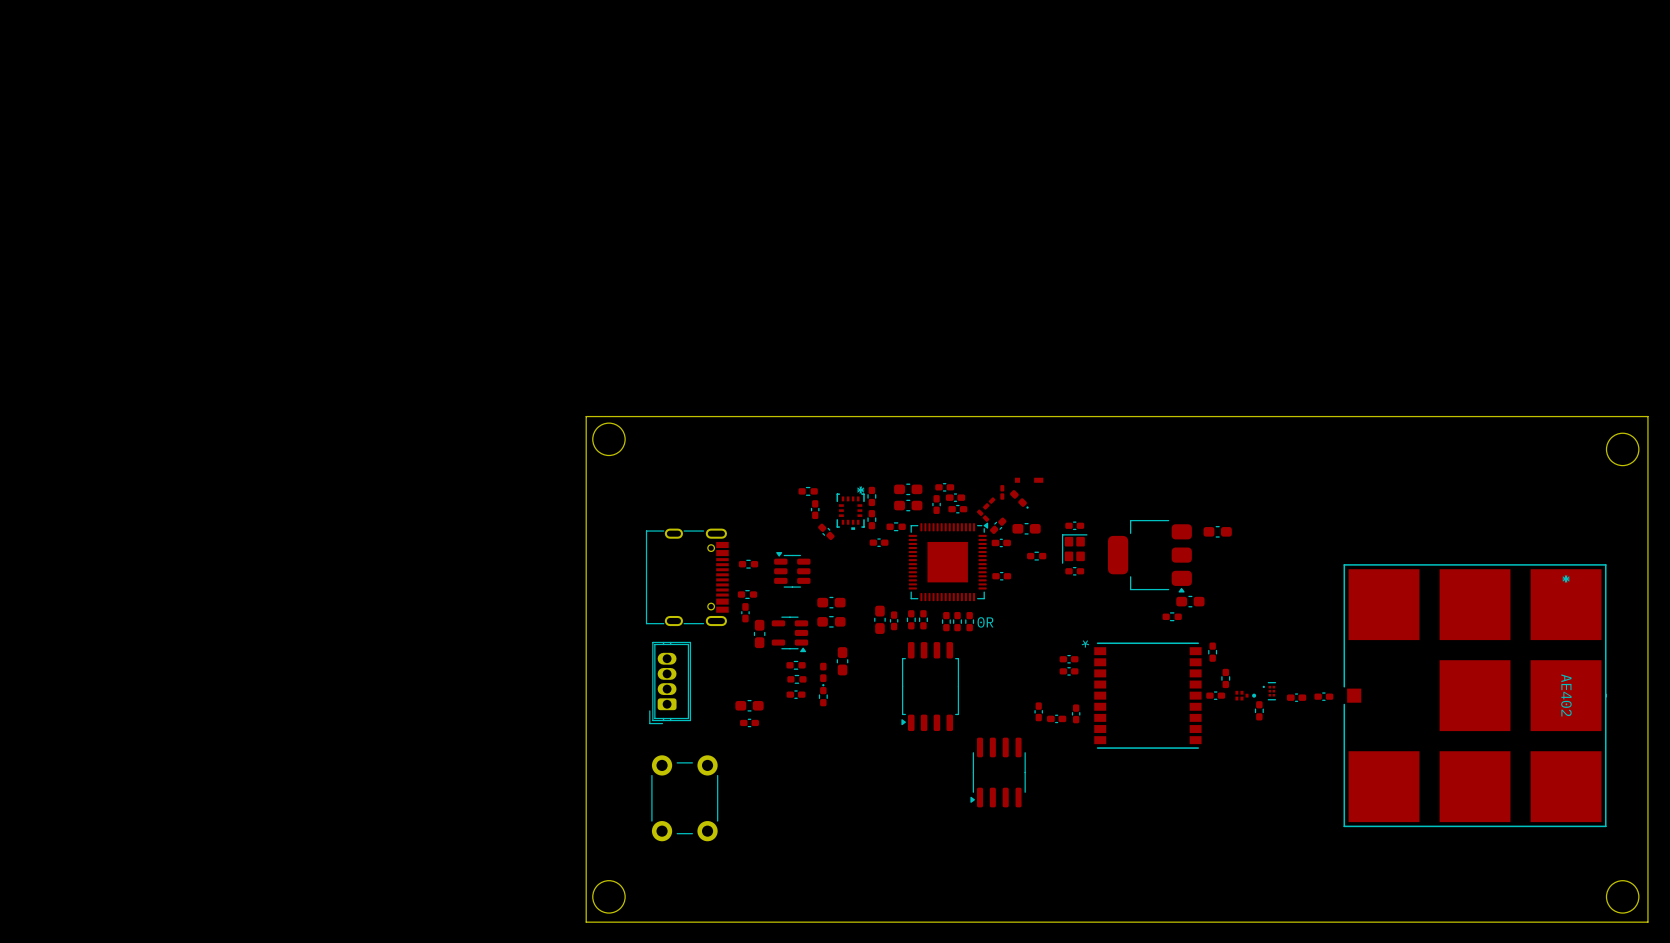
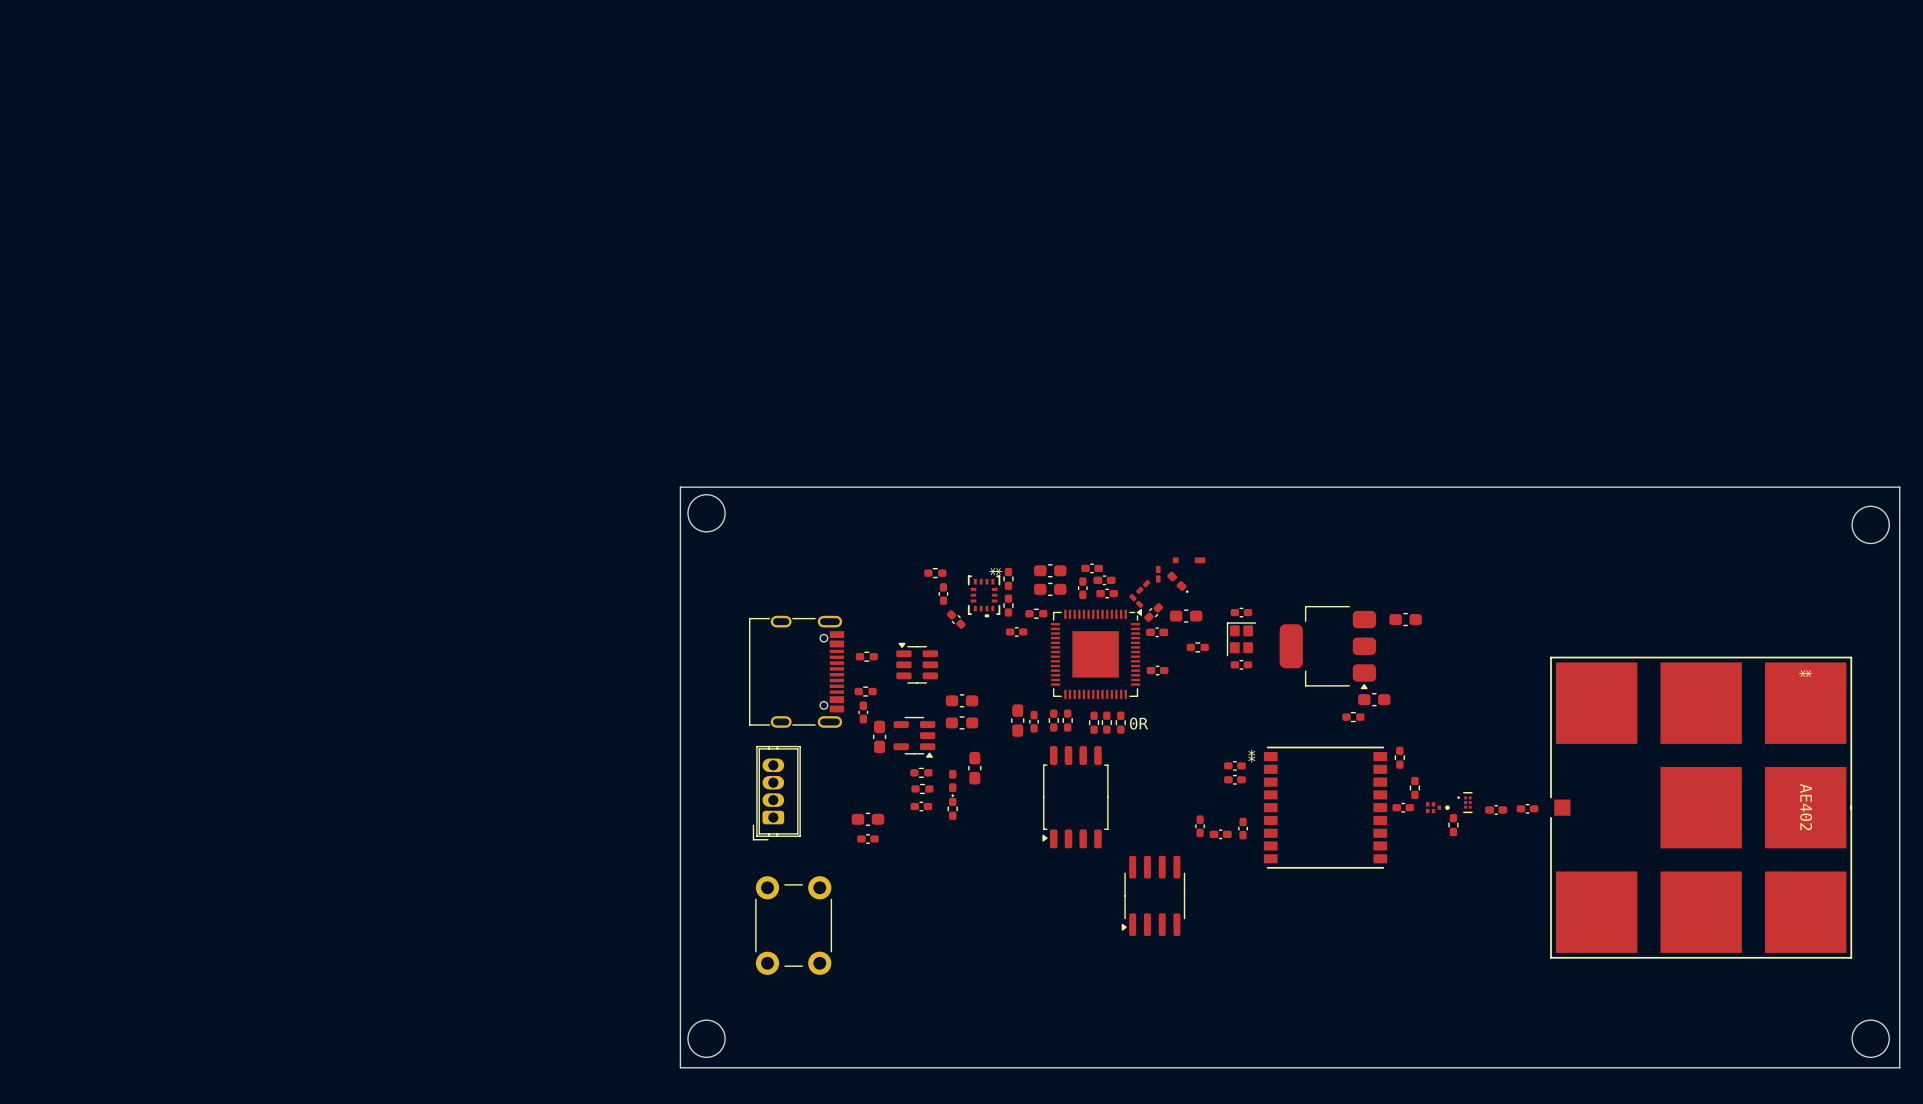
part footprint: [1094, 642, 1202, 749] -> [1263, 746, 1388, 869]

